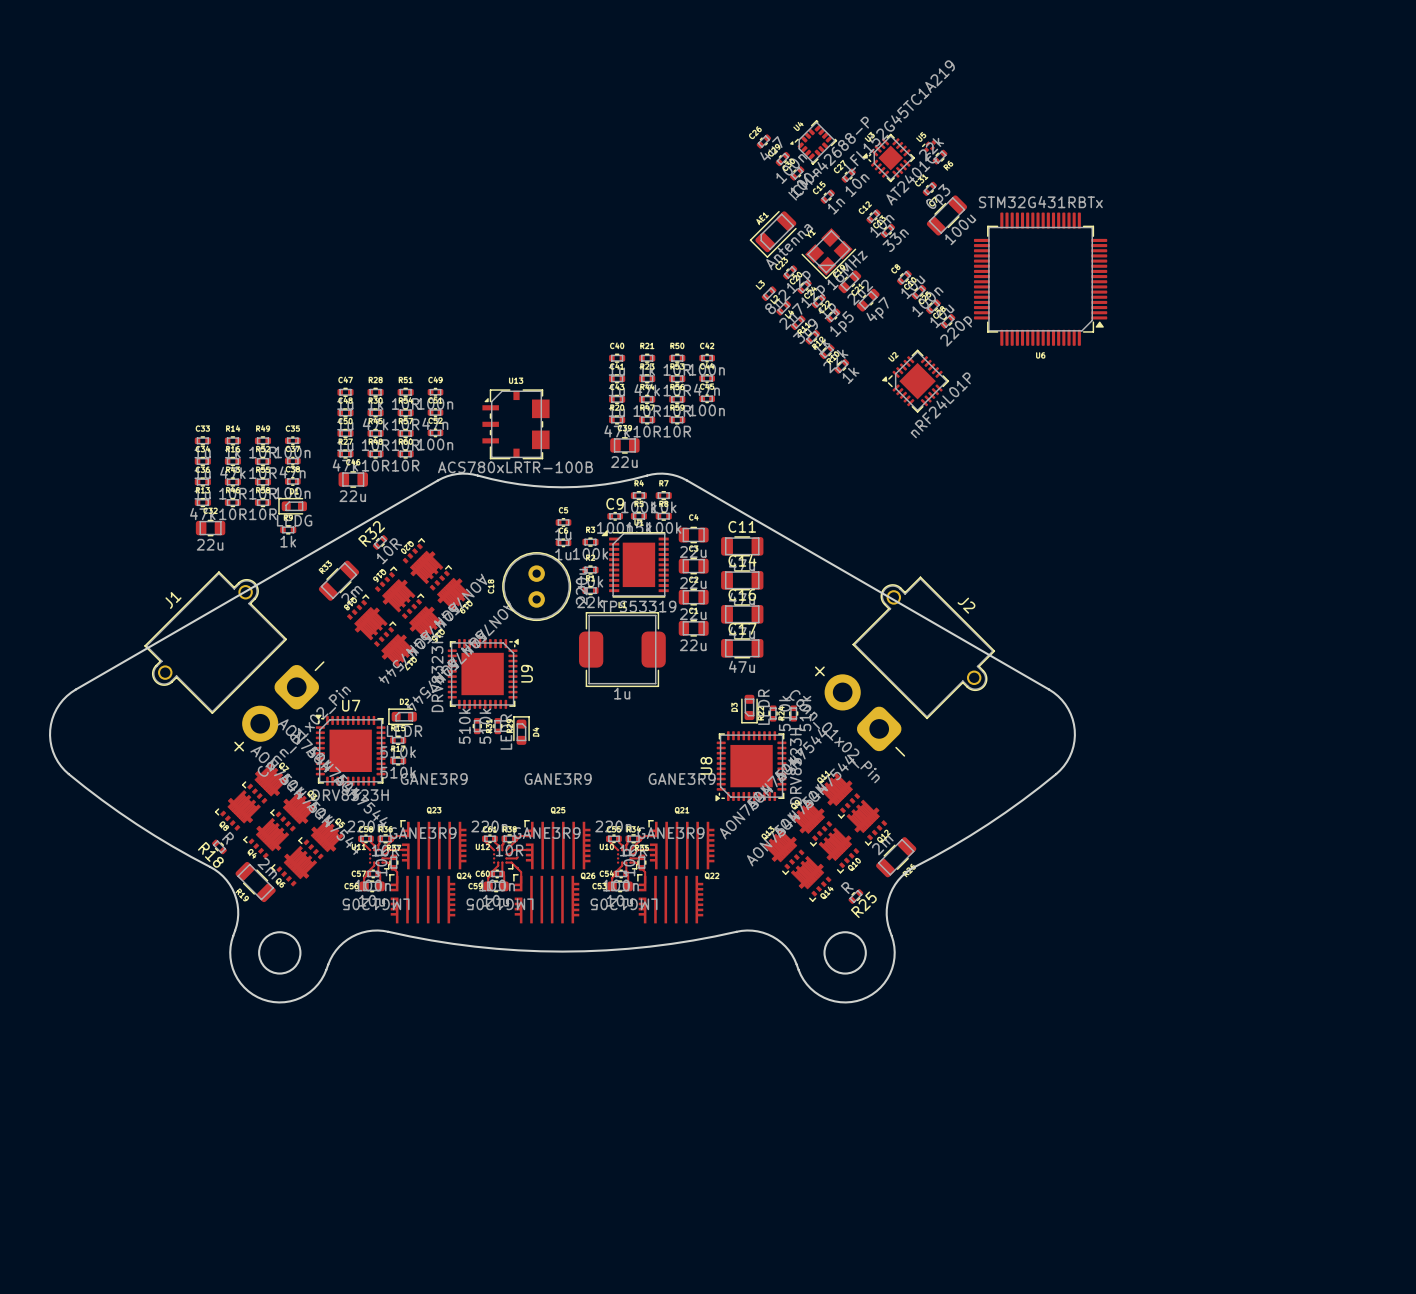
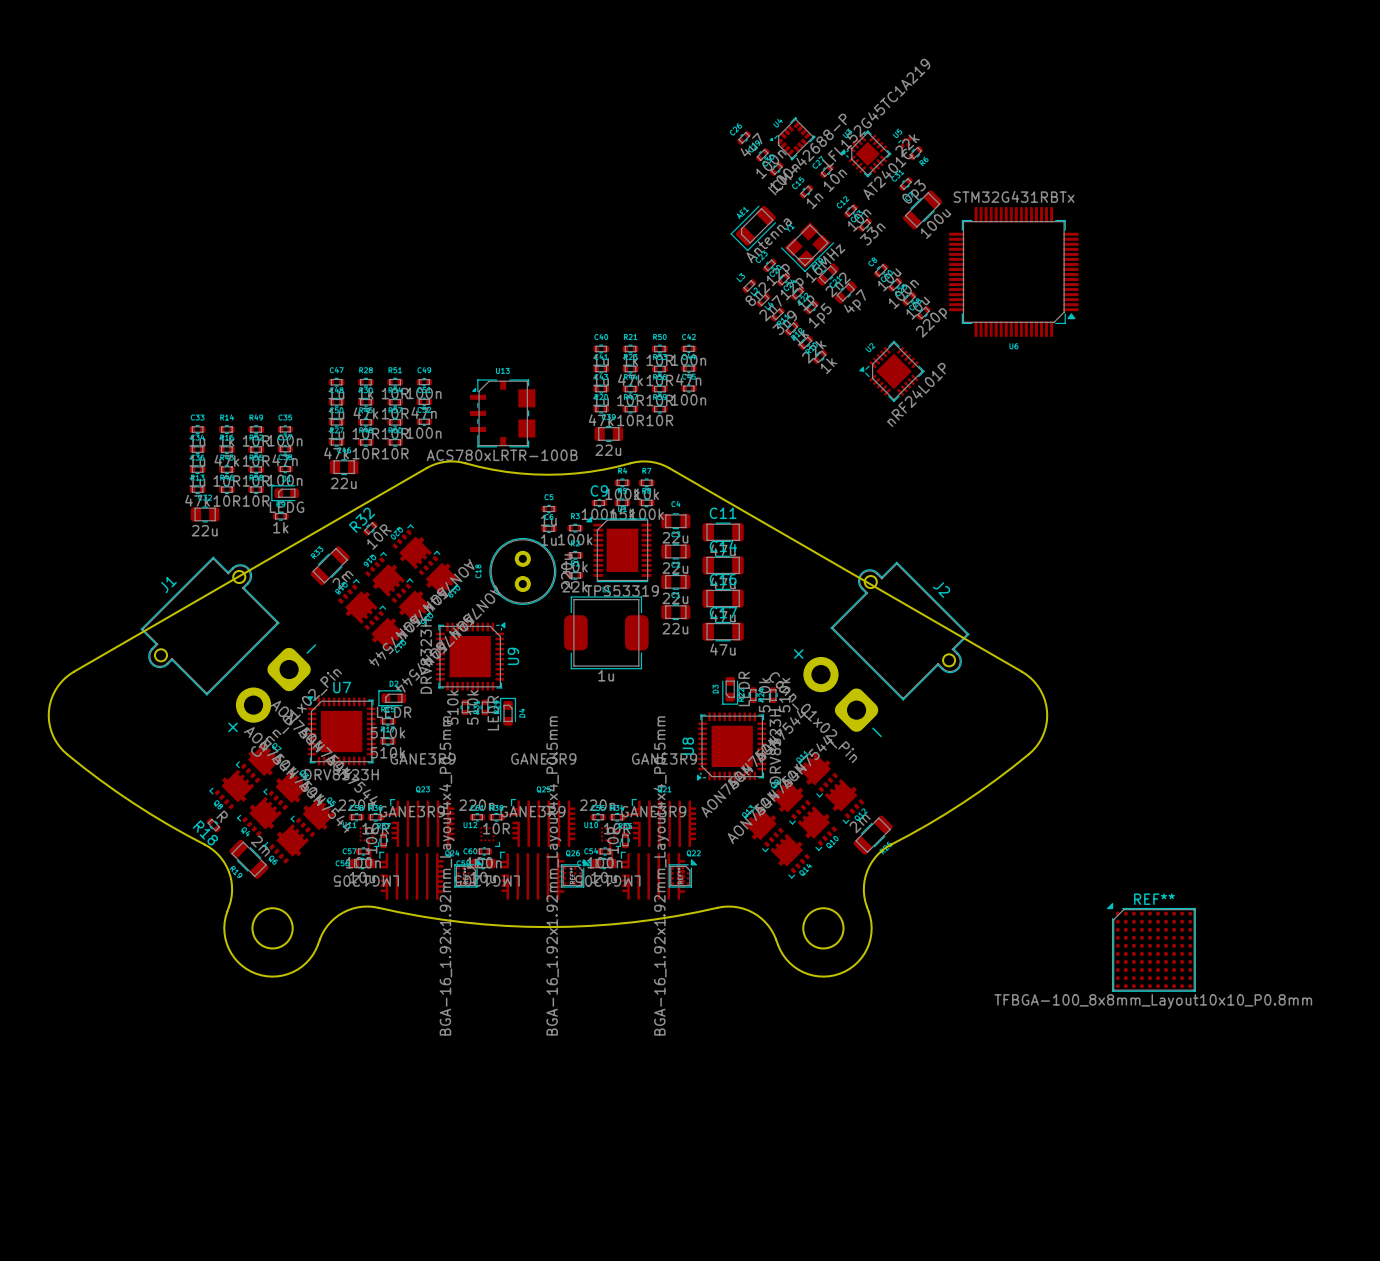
track: (379, 837) (378, 850) -> none
track: (503, 837) (502, 850) -> none
track: (627, 837) (626, 850) -> none
track: (361, 838) (370, 850) -> none
track: (370, 838) (374, 850) -> none
track: (390, 838) (390, 841) (382, 850) -> none
track: (485, 838) (494, 850) -> none
track: (494, 838) (498, 850) -> none
track: (514, 838) (514, 841) (506, 850) -> none
track: (608, 838) (618, 850) -> none
track: (618, 838) (622, 850) -> none
track: (638, 838) (638, 841) (630, 850) -> none
track: (404, 849) (390, 849) (385, 854) (382, 854) -> none
track: (528, 849) (513, 849) (509, 854) (506, 854) -> none
track: (393, 857) (382, 858) -> none
track: (517, 857) (506, 858) -> none
track: (641, 857) (630, 858) -> none
track: (374, 862) (374, 865) (364, 878) (364, 886) -> none
track: (382, 862) (387, 862) (397, 872) (396, 883) -> none
track: (498, 862) (498, 865) (488, 878) (488, 886) -> none
track: (502, 862) (504, 886) -> none
track: (506, 862) (511, 862) (521, 872) (520, 883) -> none
track: (622, 862) (622, 865) (612, 878) (612, 886) -> none
track: (630, 862) (635, 862) (645, 872) (644, 883) -> none
part: none -> BGA-16_1.92x1.92mm_Layout4x4_P0.5mm (468, 873)
part: none -> BGA-16_1.92x1.92mm_Layout4x4_P0.5mm (575, 873)
part: none -> BGA-16_1.92x1.92mm_Layout4x4_P0.5mm (682, 873)
R25: R (855, 896) -> none
REF**: none -> TFBGA-100_8x8mm_Layout10x10_P0.8mm (1151, 947)

